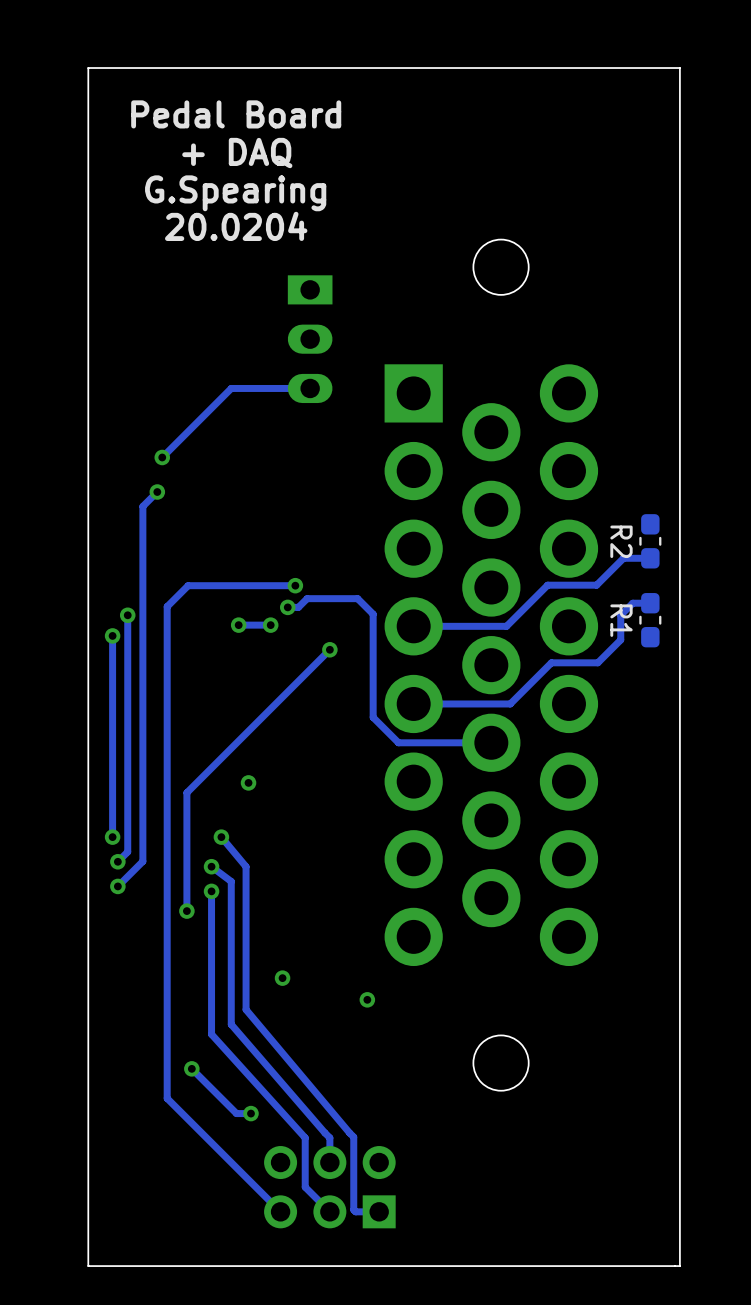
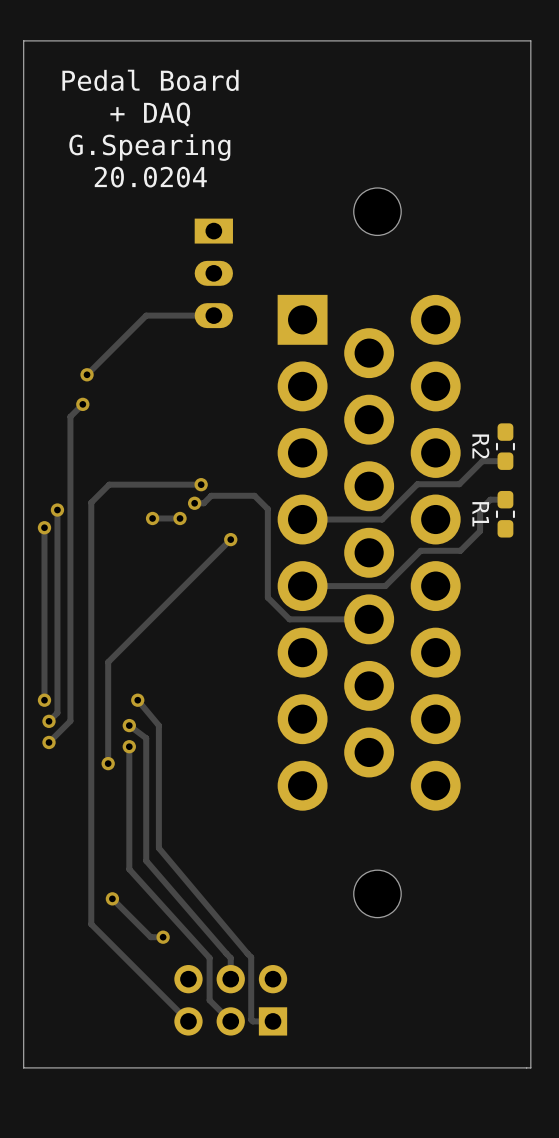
via: (248, 782) -> none
via: (282, 978) -> none
via: (367, 999) -> none

